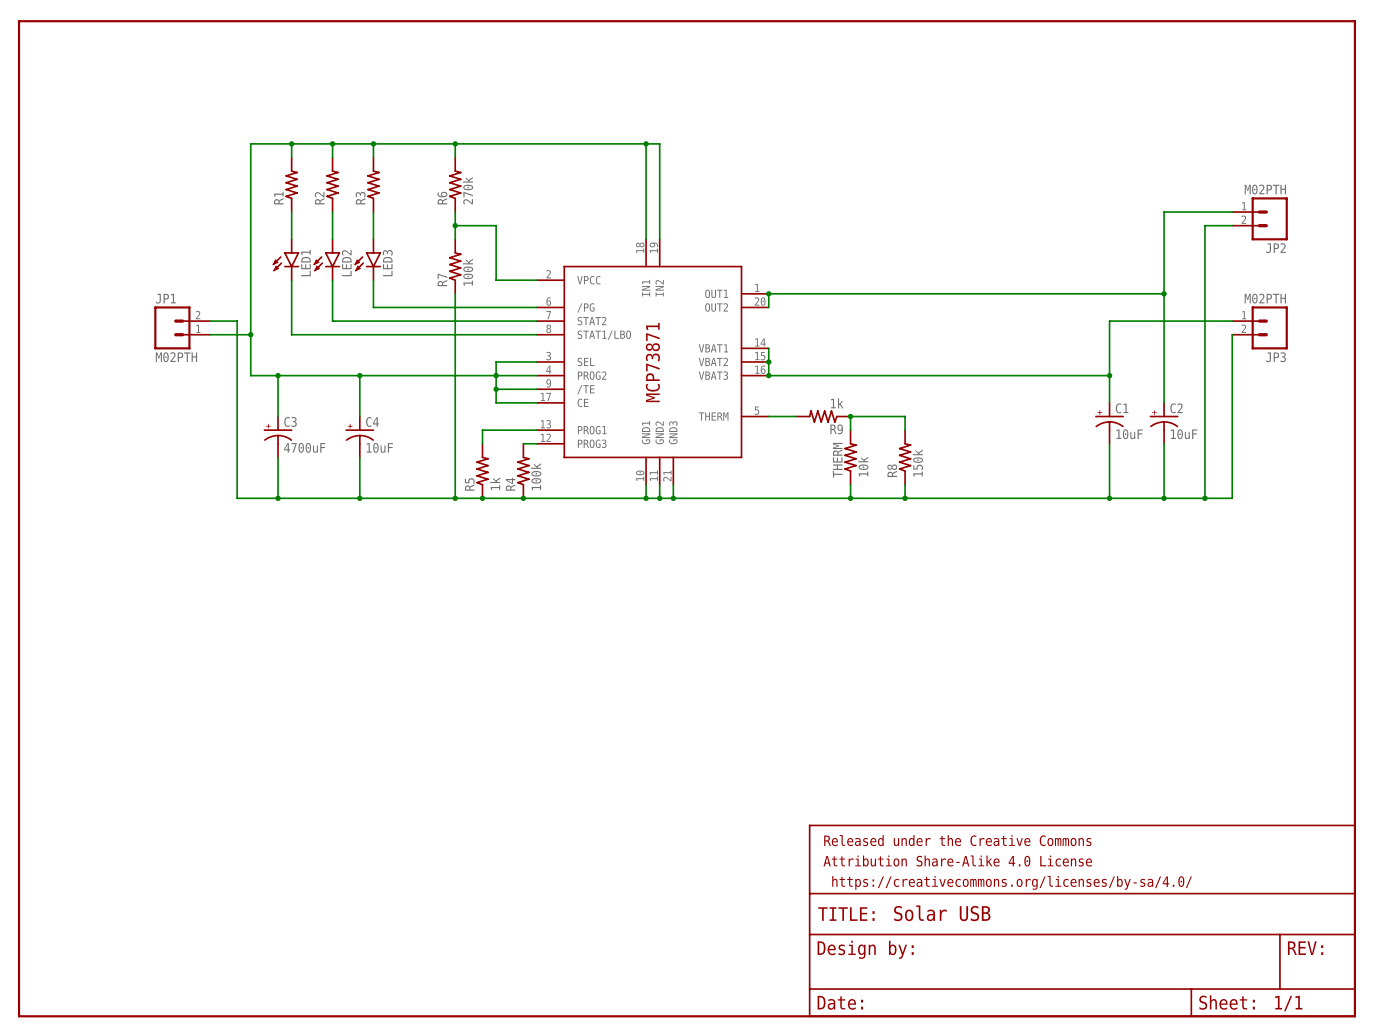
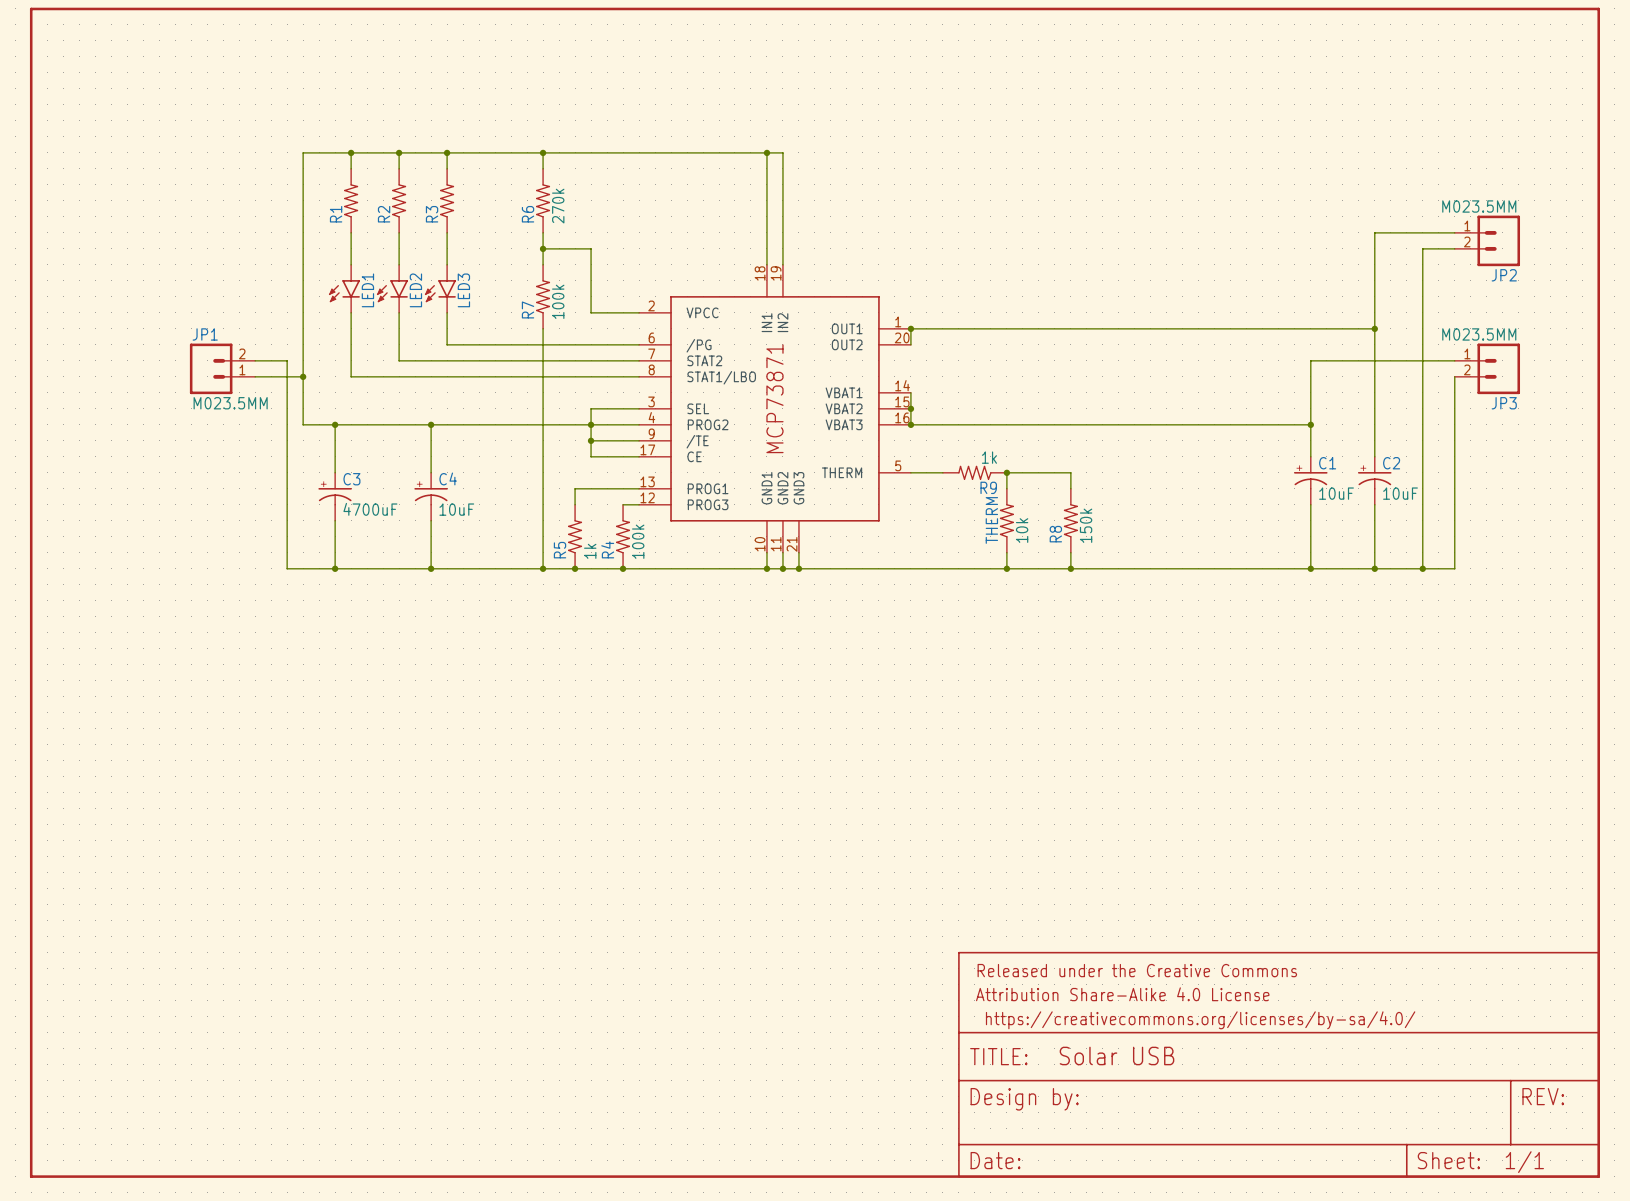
JP2 value: M02PTH (1265, 189) -> M023.5MM (1479, 206)
JP3 value: M02PTH (1265, 298) -> M023.5MM (1479, 334)
JP1 value: M02PTH (176, 357) -> M023.5MM (230, 403)

